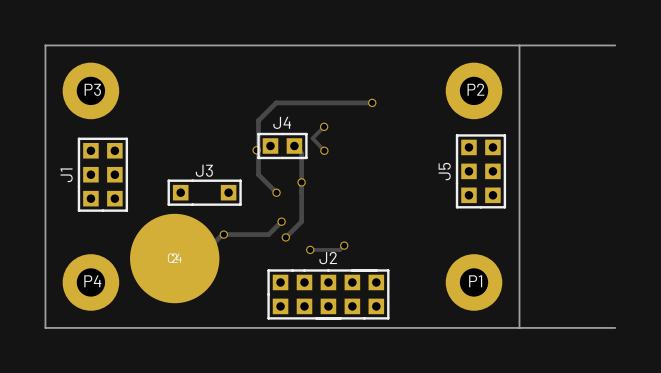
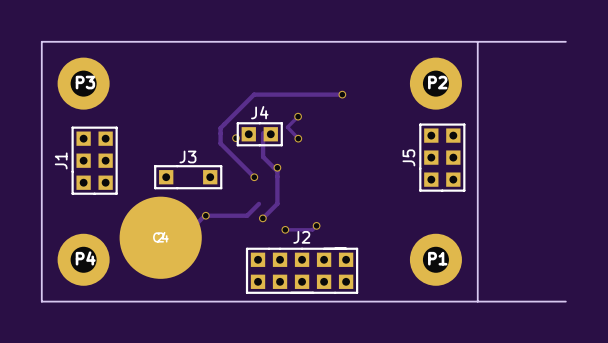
track: (258, 120) (258, 174) -> (237, 110) (220, 128) (220, 143) (237, 160)
track: (294, 145) (301, 153) (301, 186) -> (263, 133) (263, 156) (277, 171)
via: (281, 221) -> none

